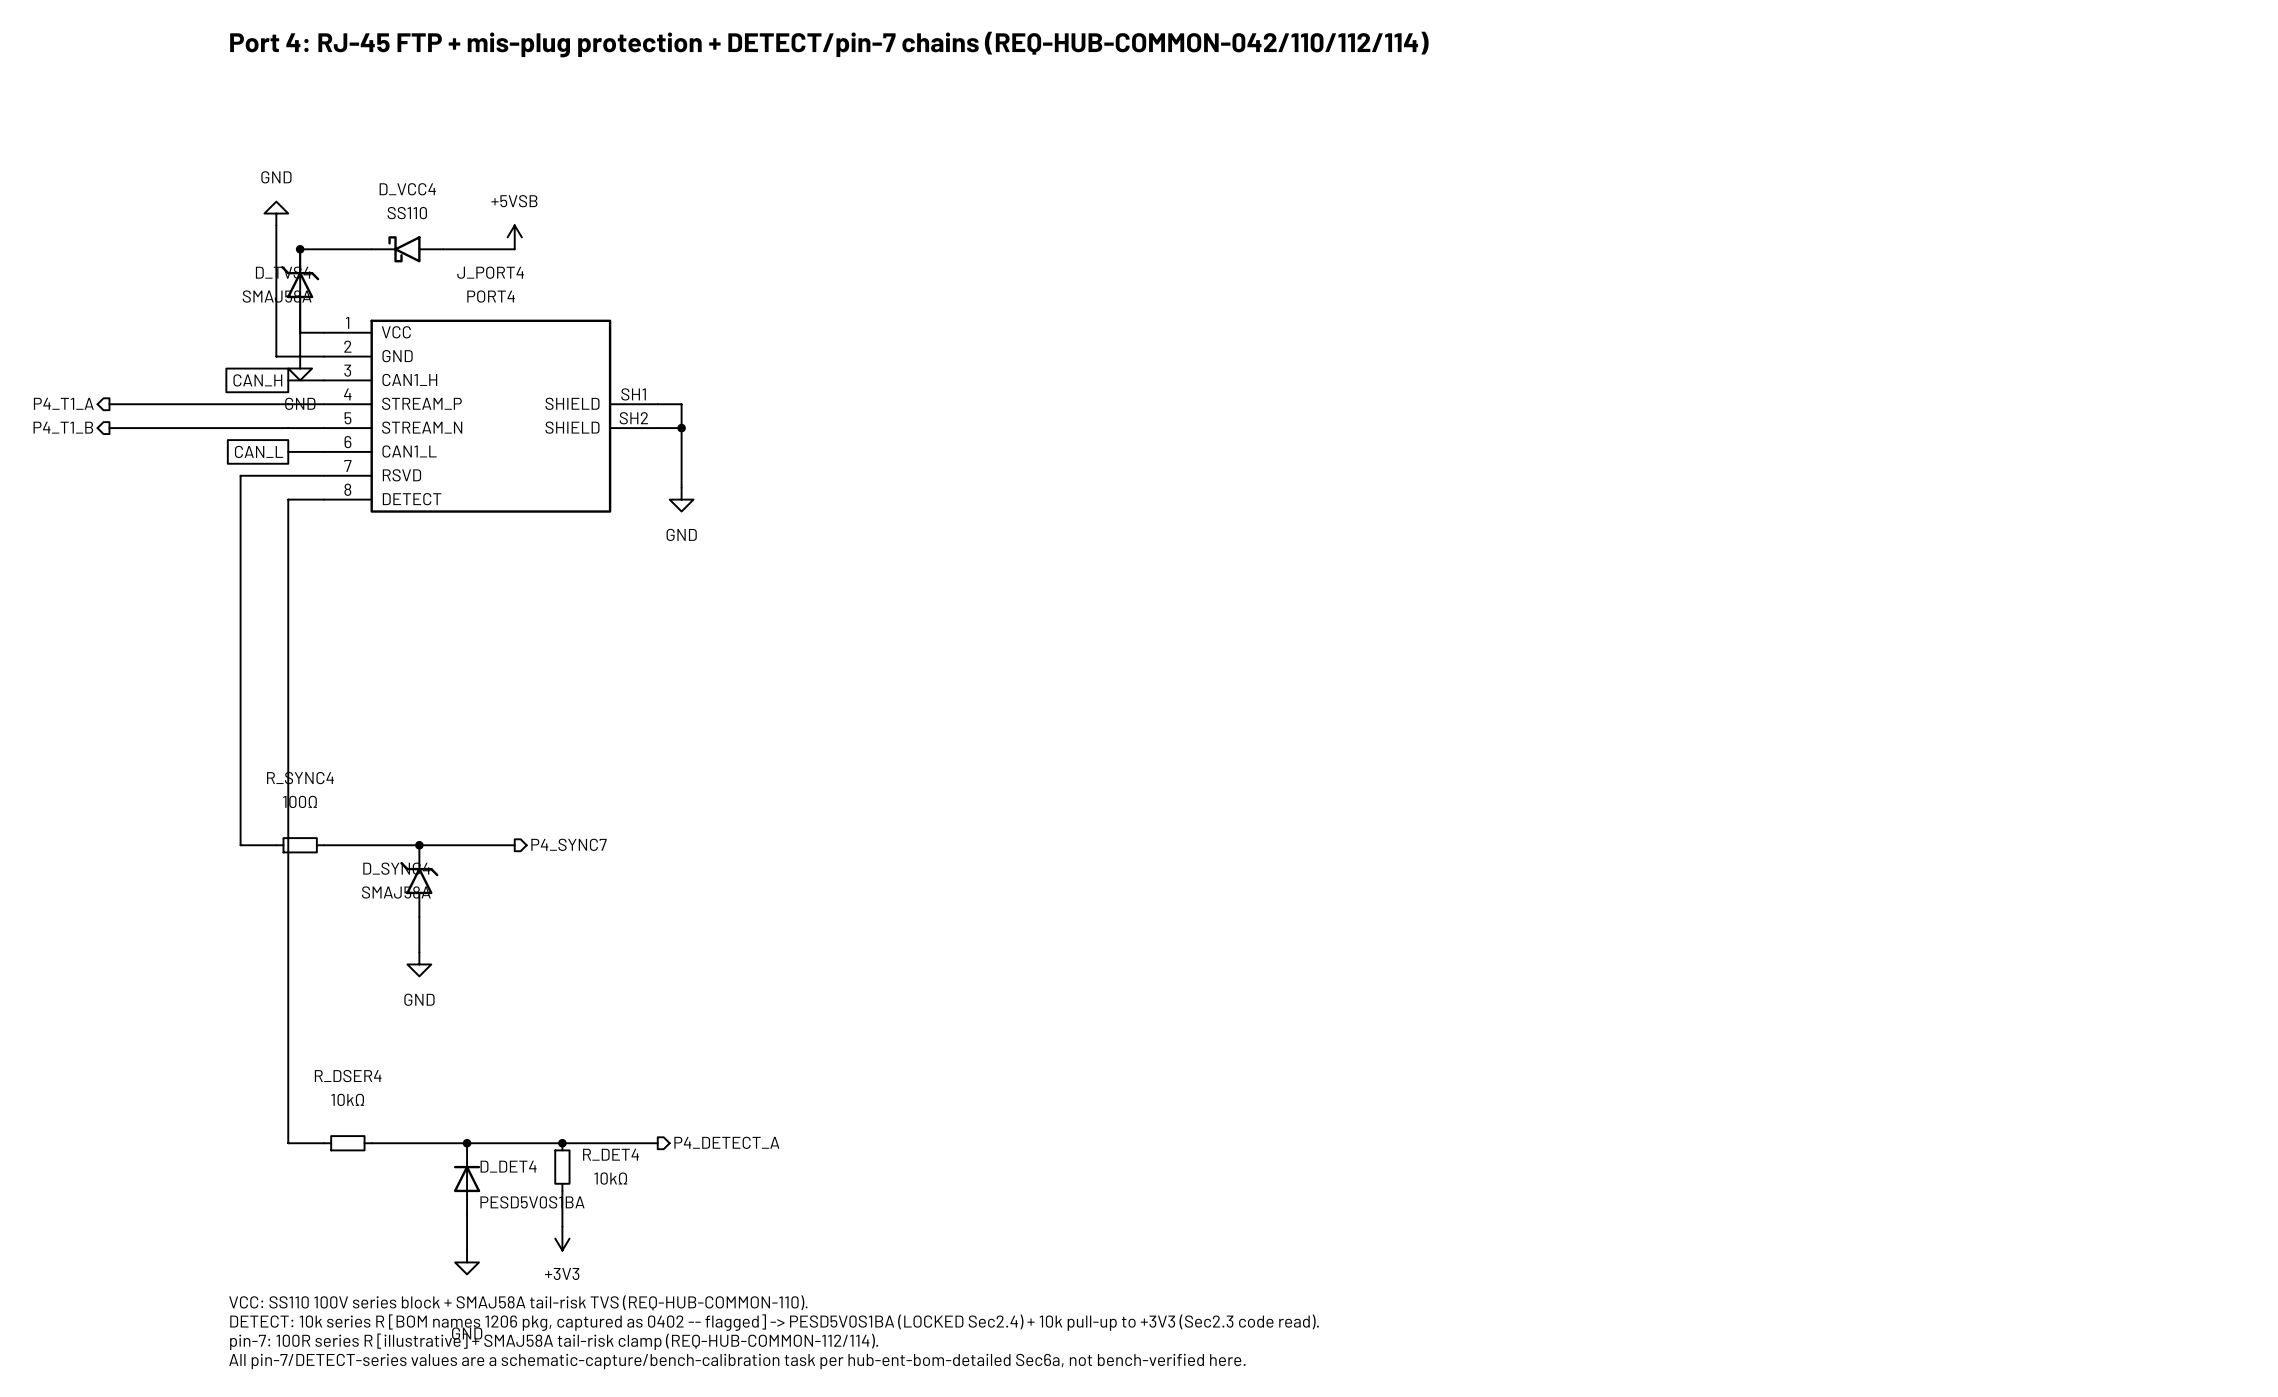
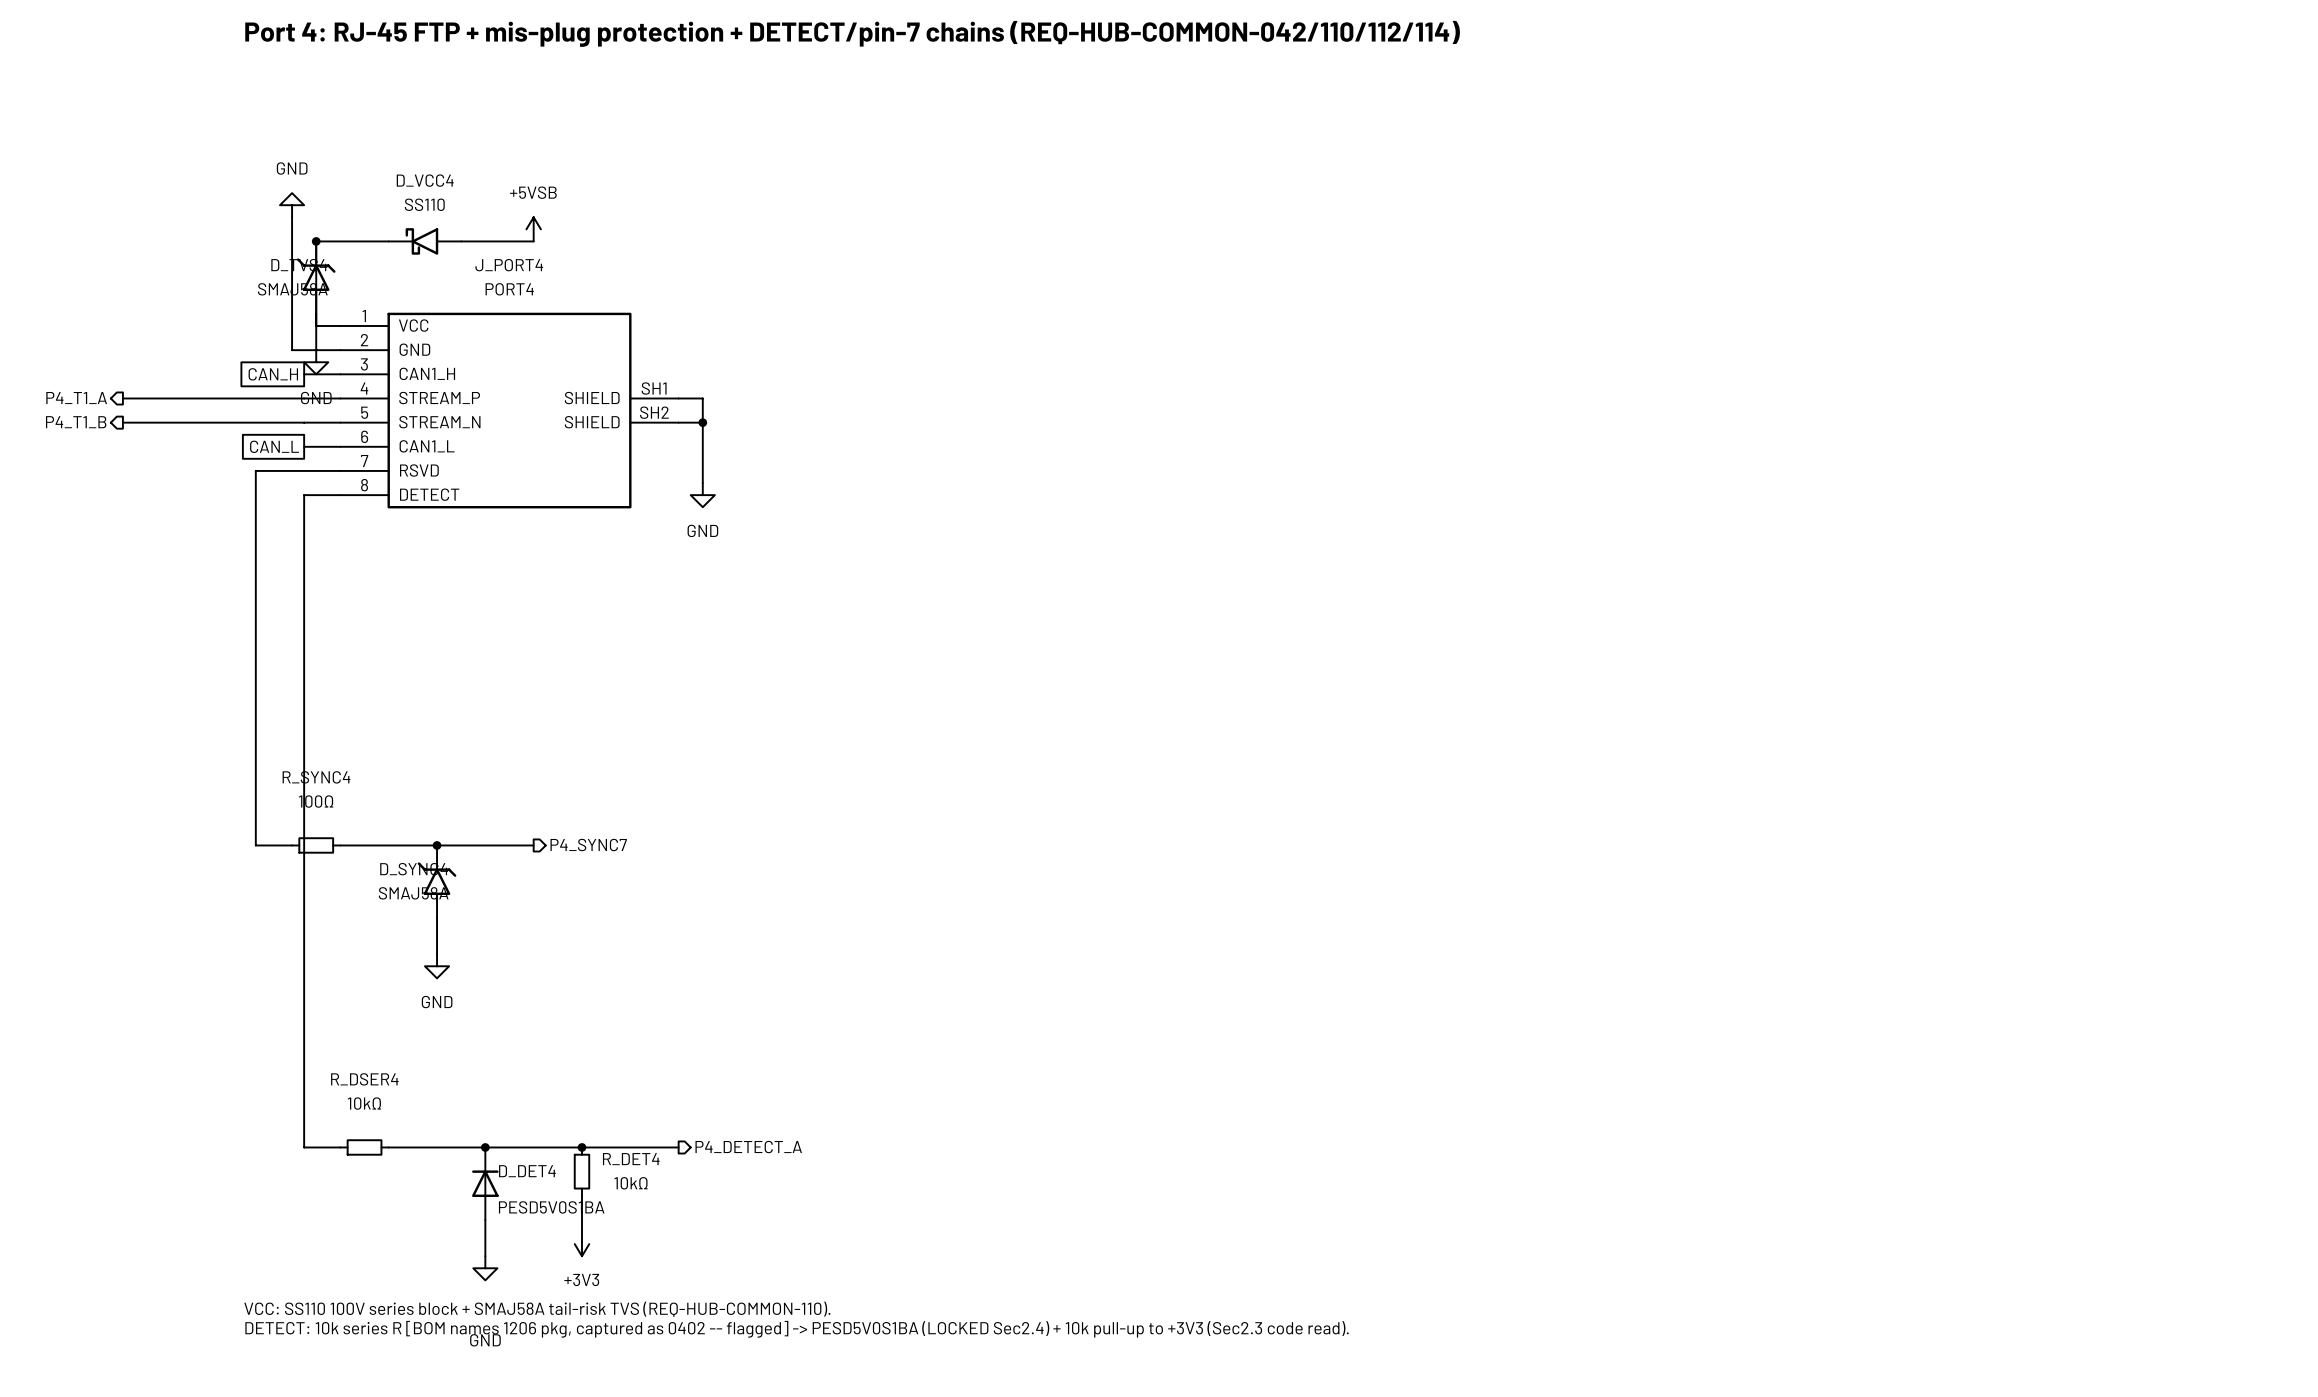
text: pin-7: 100R series R [illustrative] + SMAJ58A tail-risk clamp (REQ-HUB-COMMON-112/114). (554, 1341) -> none
text: All pin-7/DETECT-series values are a schematic-capture/bench-calibration task per hub-ent-bom-detailed Sec6a, not bench-verified here. (737, 1361) -> none

